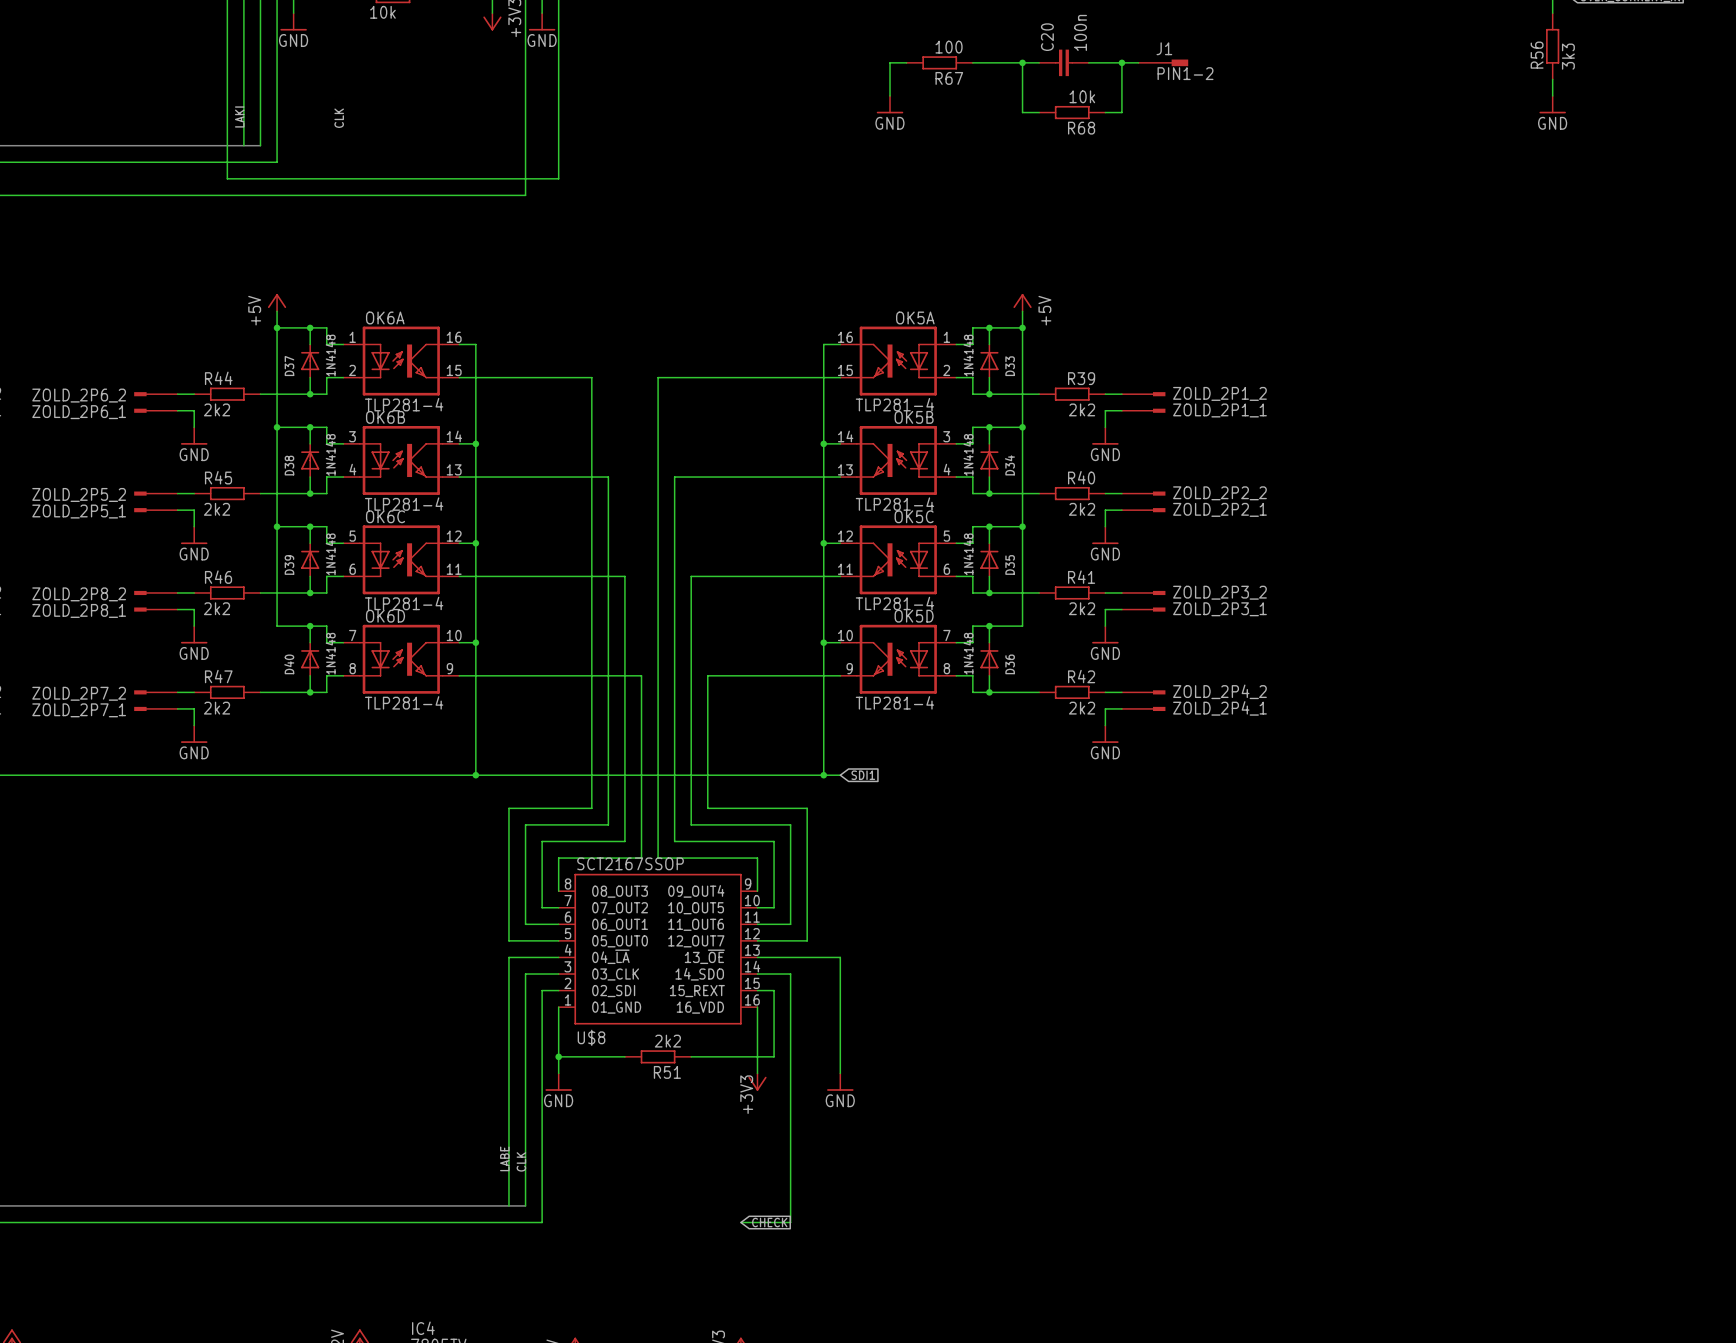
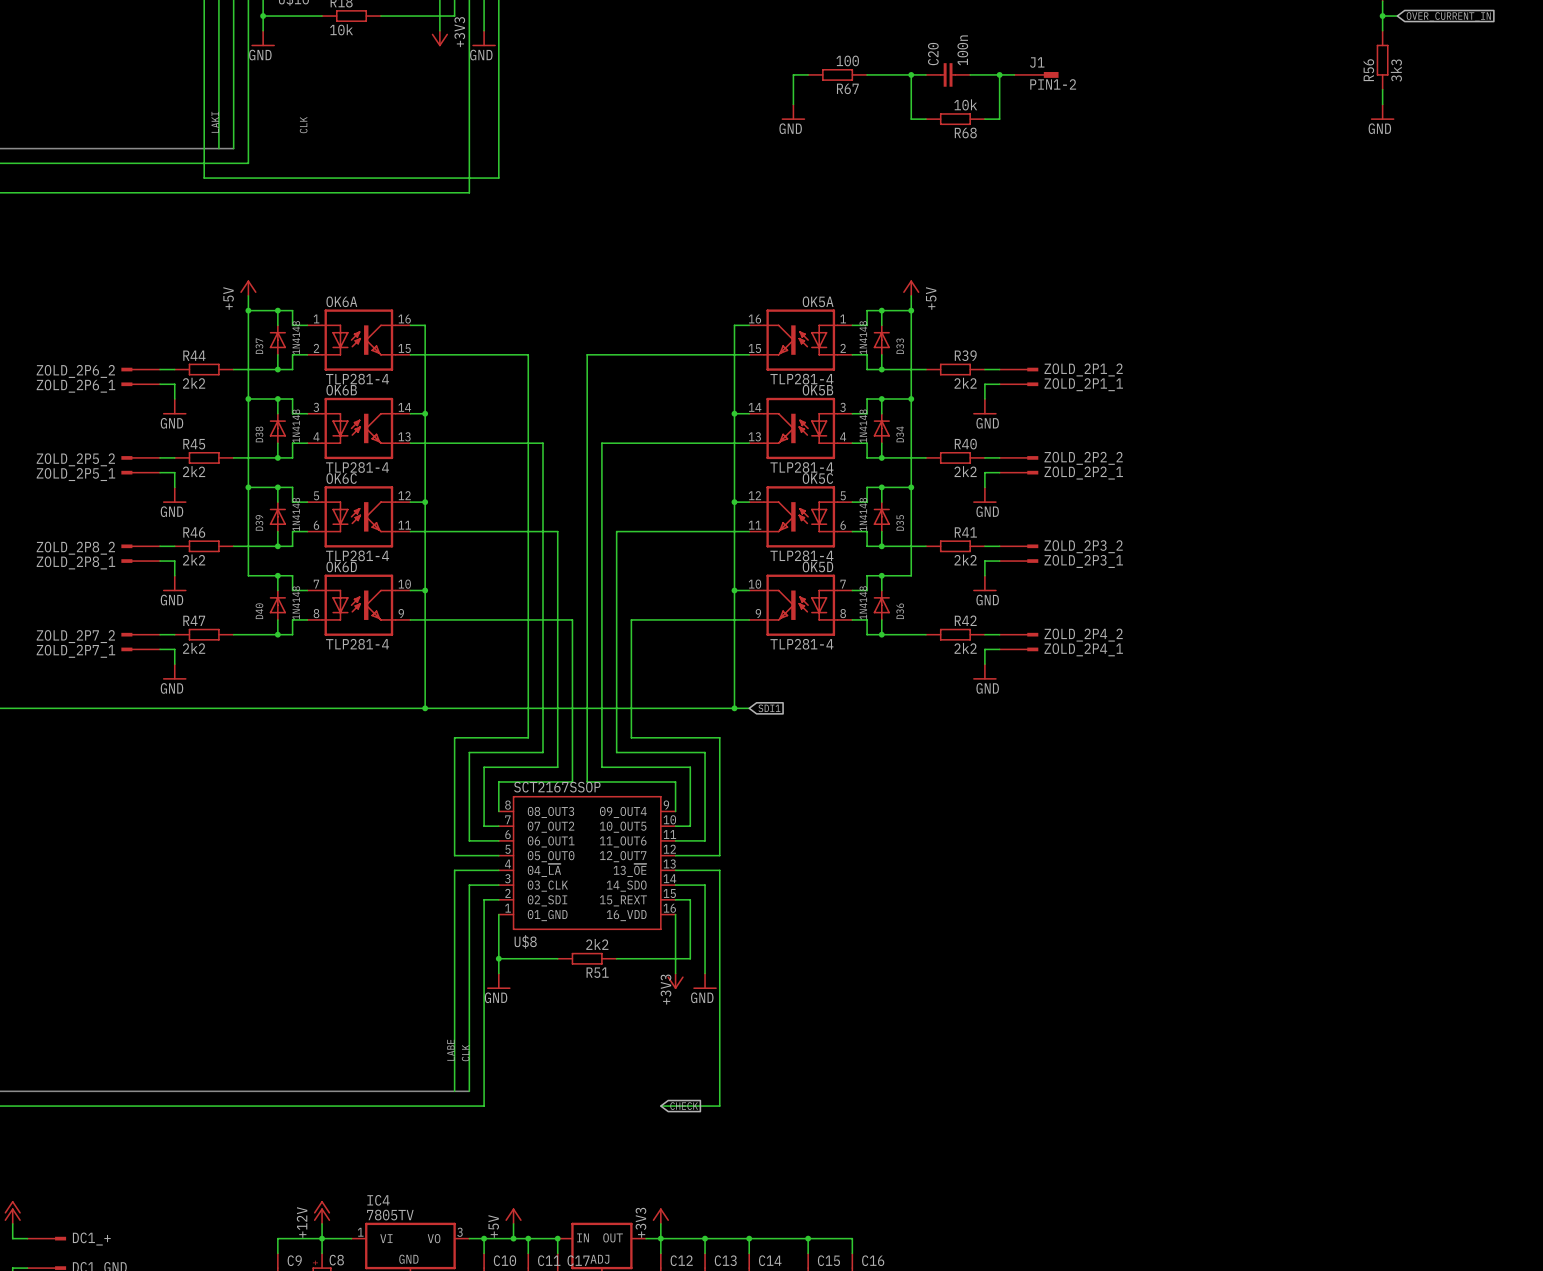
wire: (807, 957) (840, 957) (840, 1073) -> none
wire: (790, 1073) (790, 1222) -> (719, 870) (719, 1106) (705, 1106)
power symbol position: GND (840, 1082) -> GND (705, 981)

